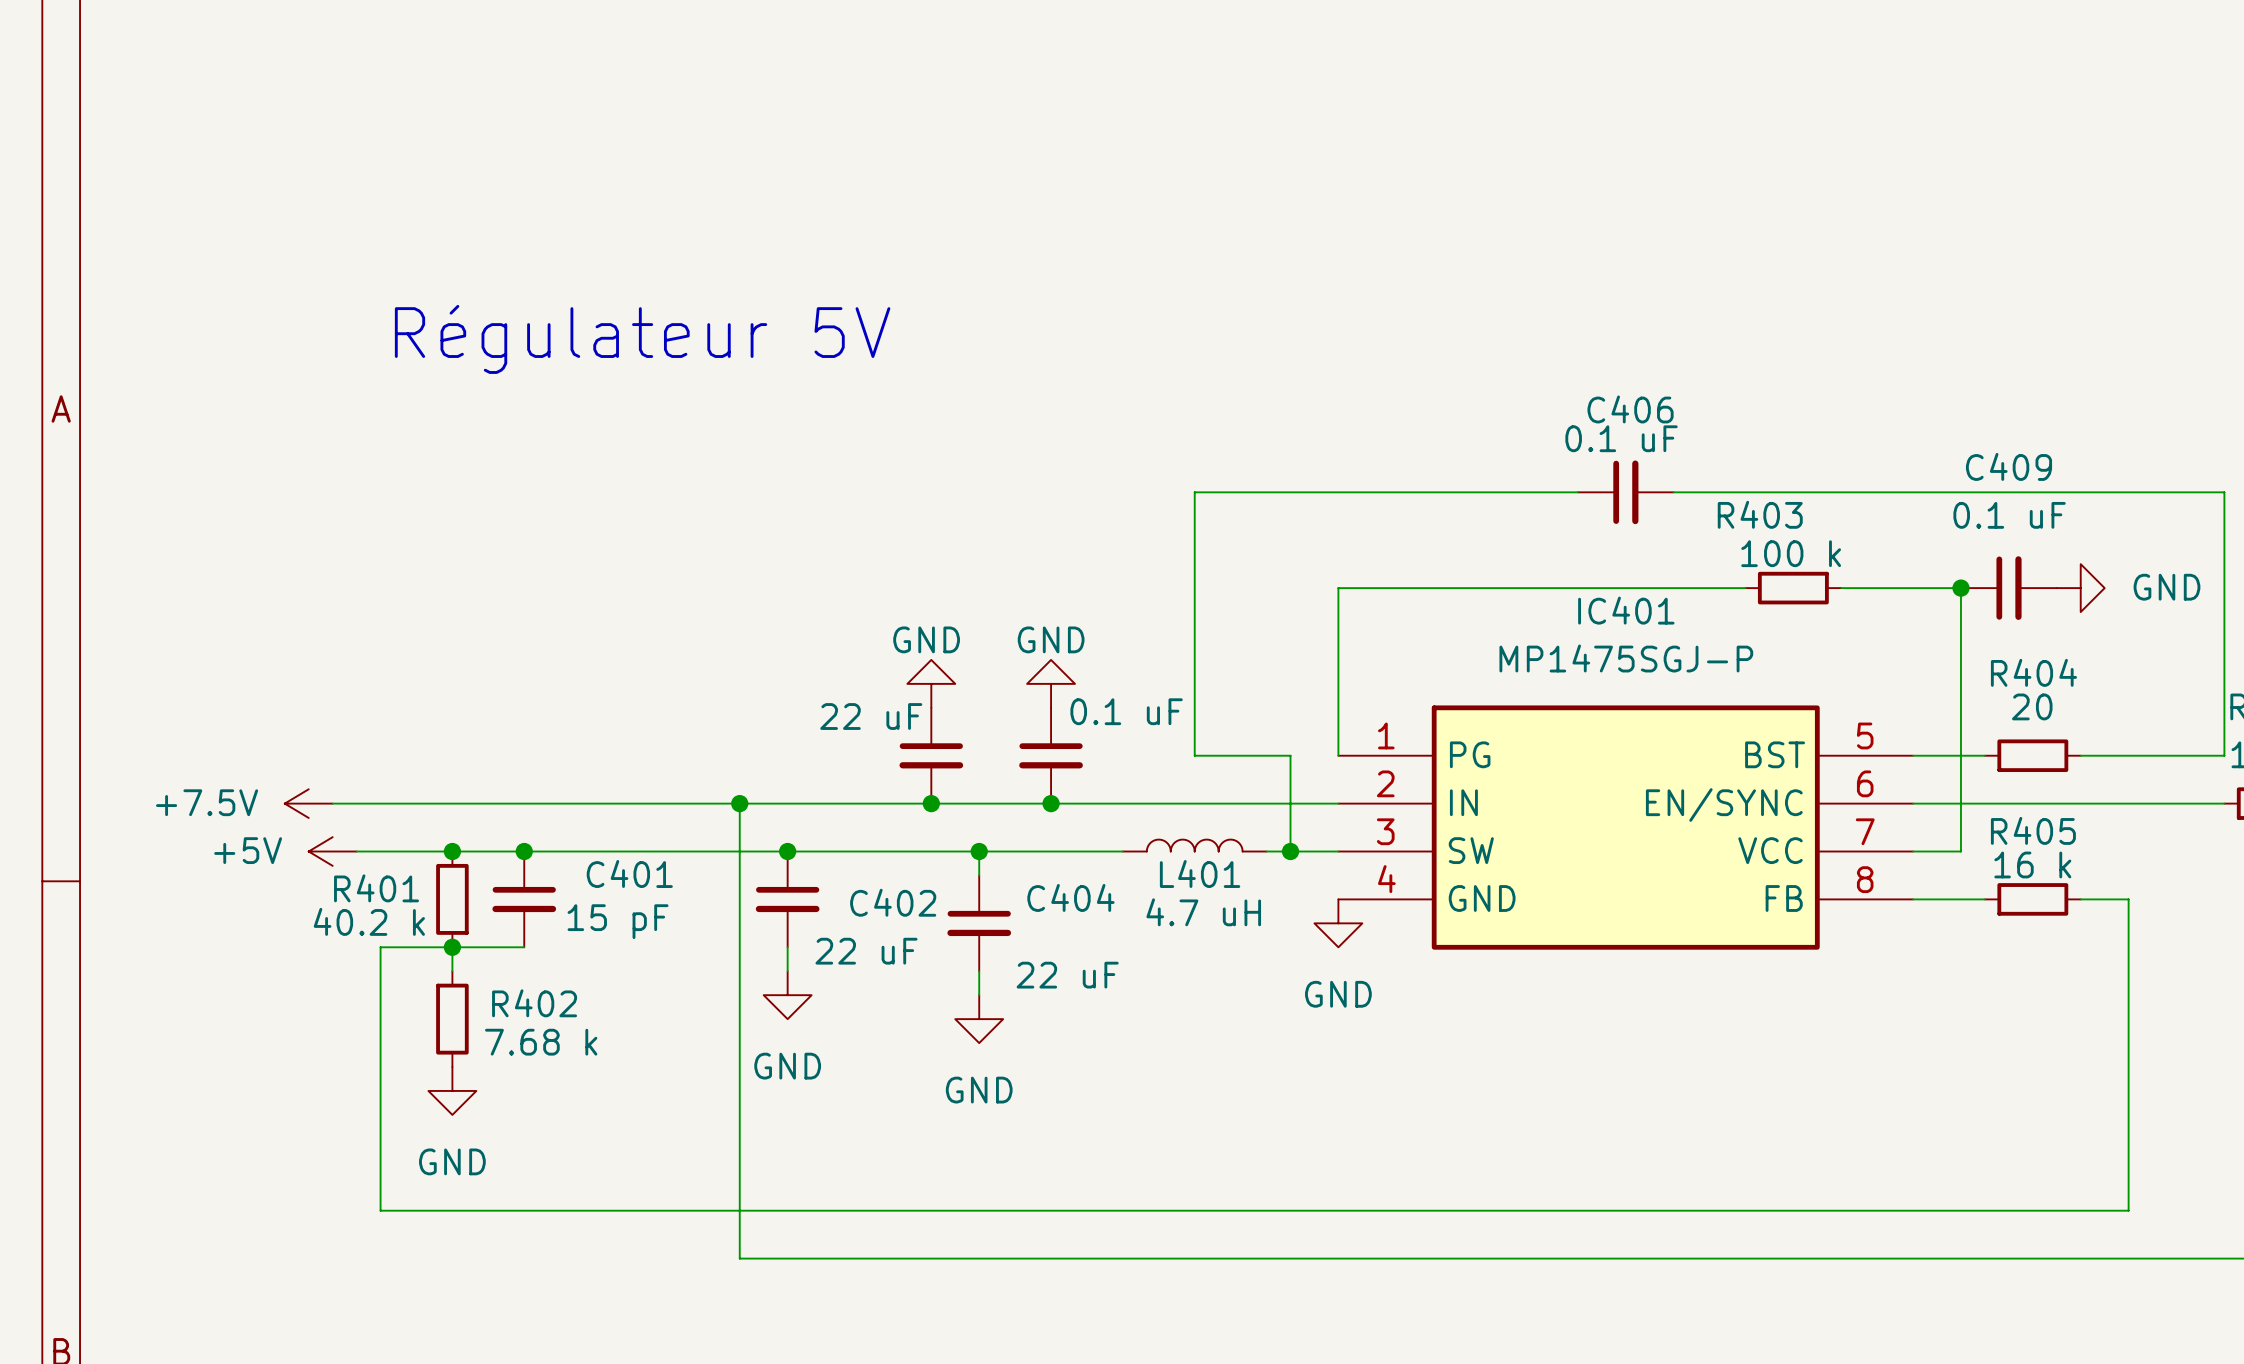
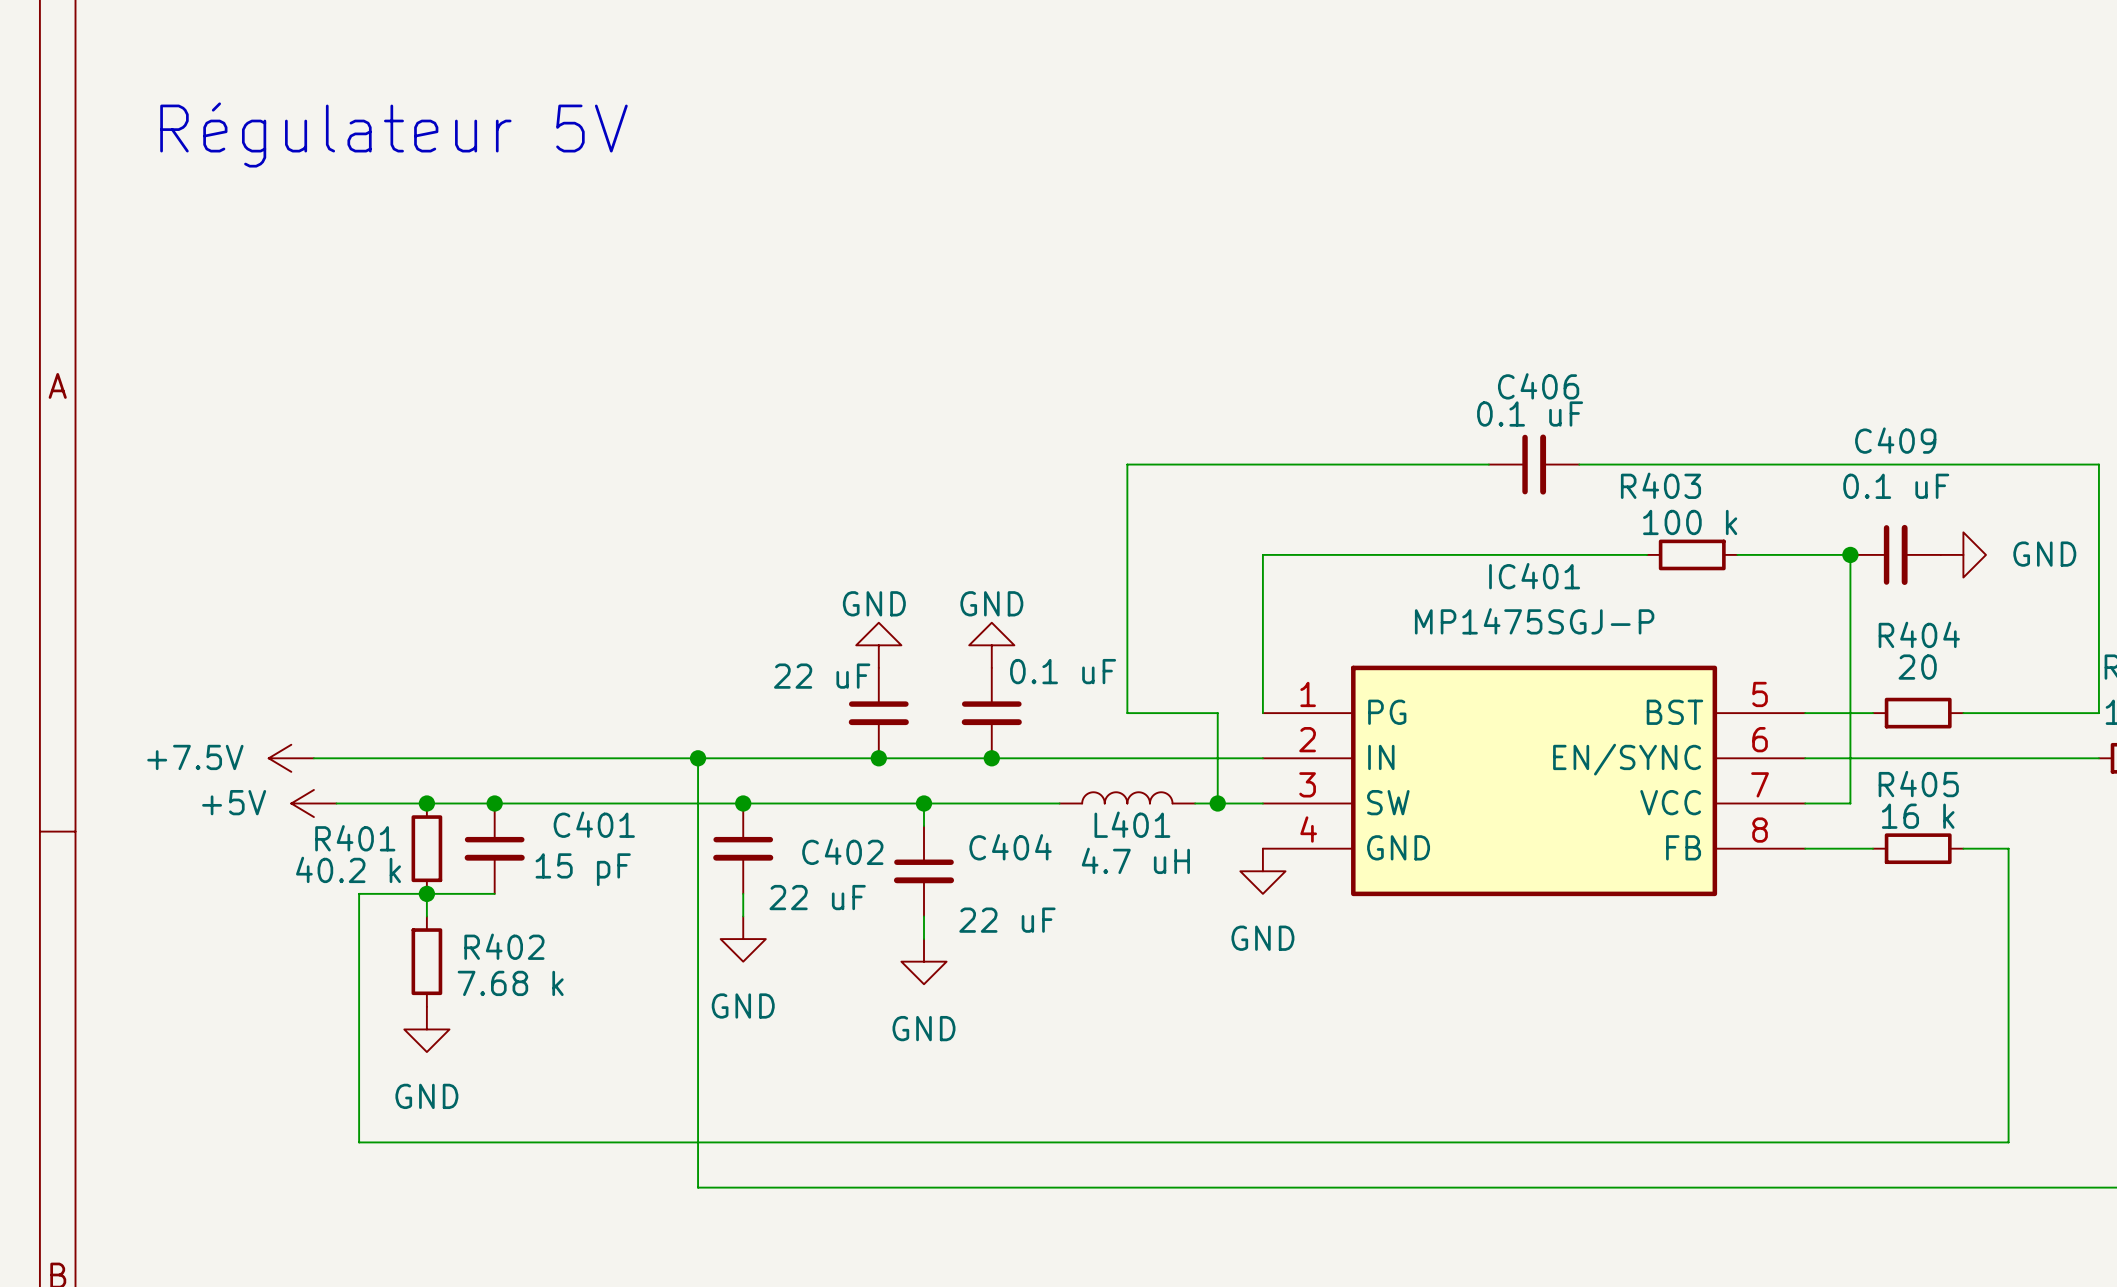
text position: Régulateur 5V (642, 339) -> Régulateur 5V (393, 134)

